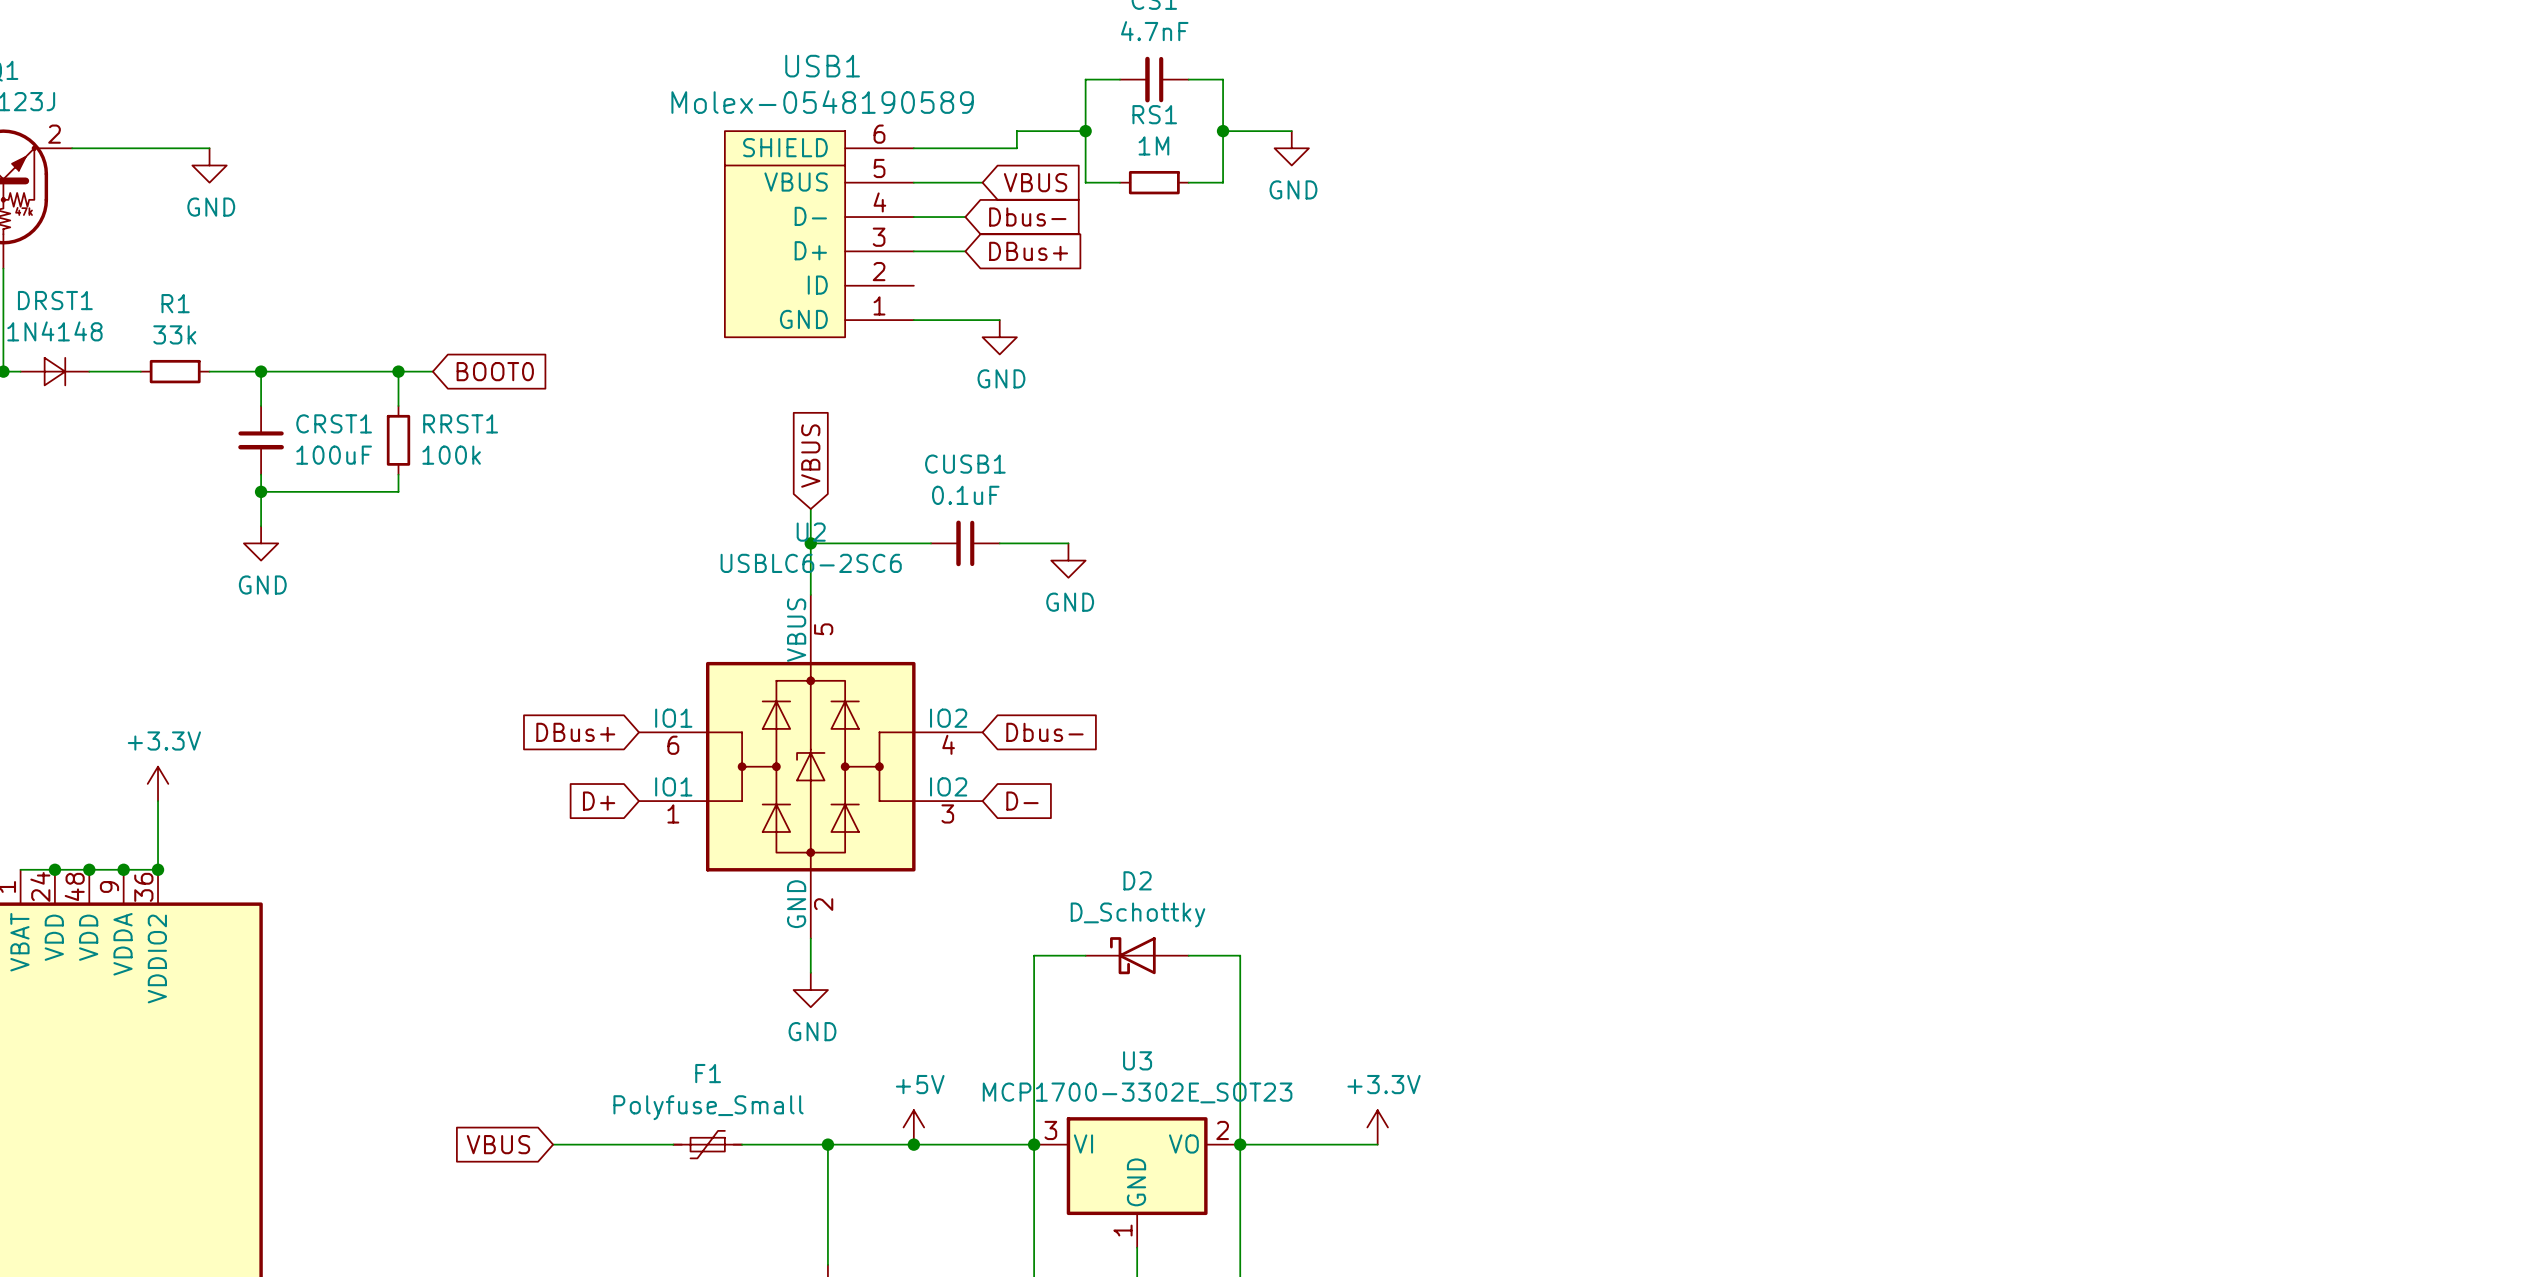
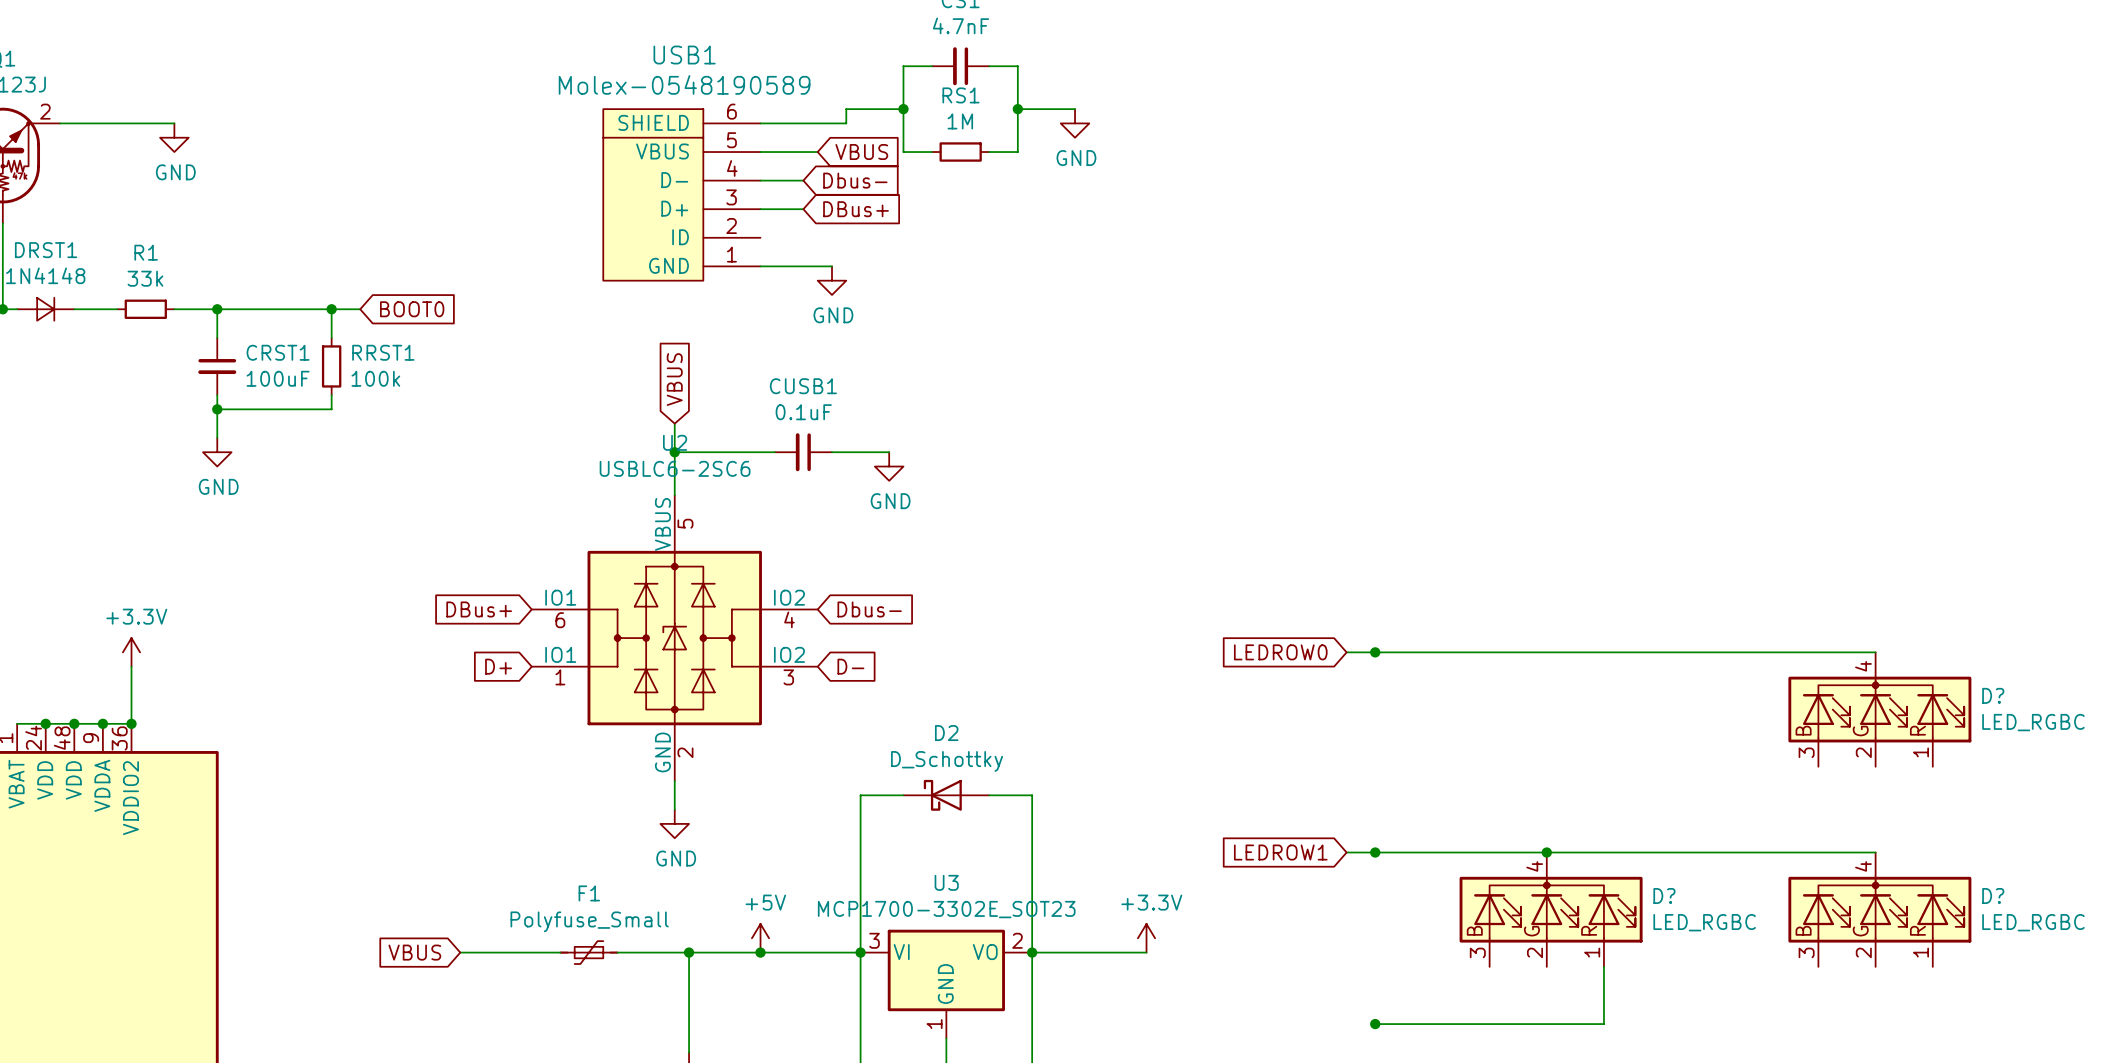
global label: none -> LEDROW0 (1280, 652)
wire: none -> (1346, 652) (1875, 652)
junction: none -> (1375, 652)
D?: none -> LED_RGBC (1879, 709)
global label: none -> LEDROW1 (1280, 852)
wire: none -> (1346, 852) (1875, 852)
junction: none -> (1375, 852)
junction: none -> (1546, 852)
D?: none -> LED_RGBC (1551, 909)
D?: none -> LED_RGBC (1879, 909)
wire: none -> (1603, 966) (1603, 1024) (1375, 1024)
junction: none -> (1375, 1024)

